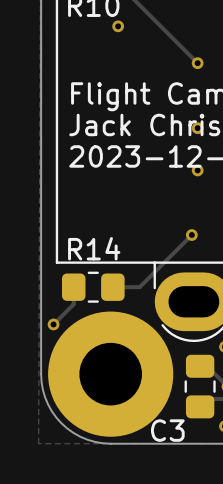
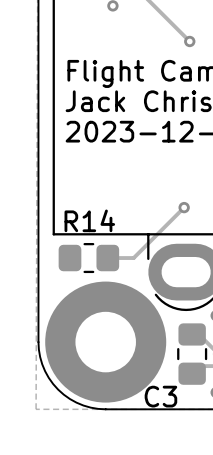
via: (197, 128) -> none
via: (197, 170) -> none
track: (73, 287) (73, 304) (53, 324) -> none
via: (53, 324) -> none

